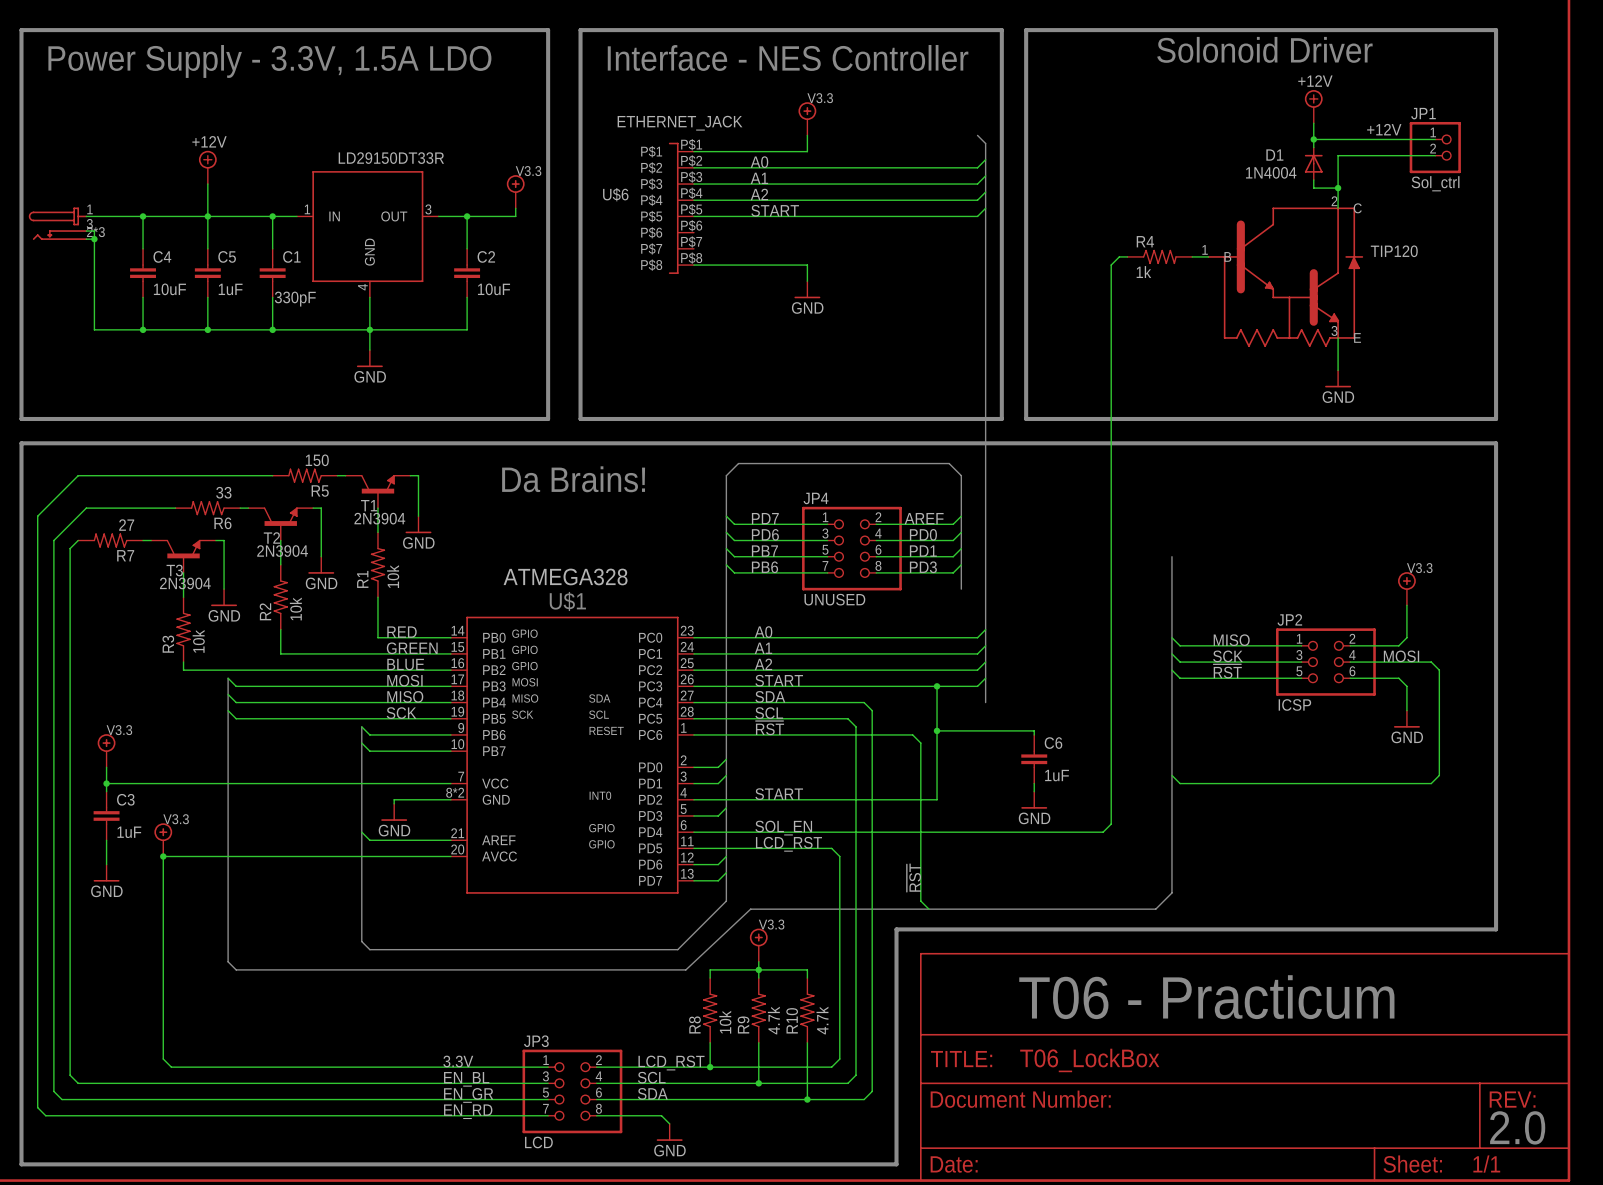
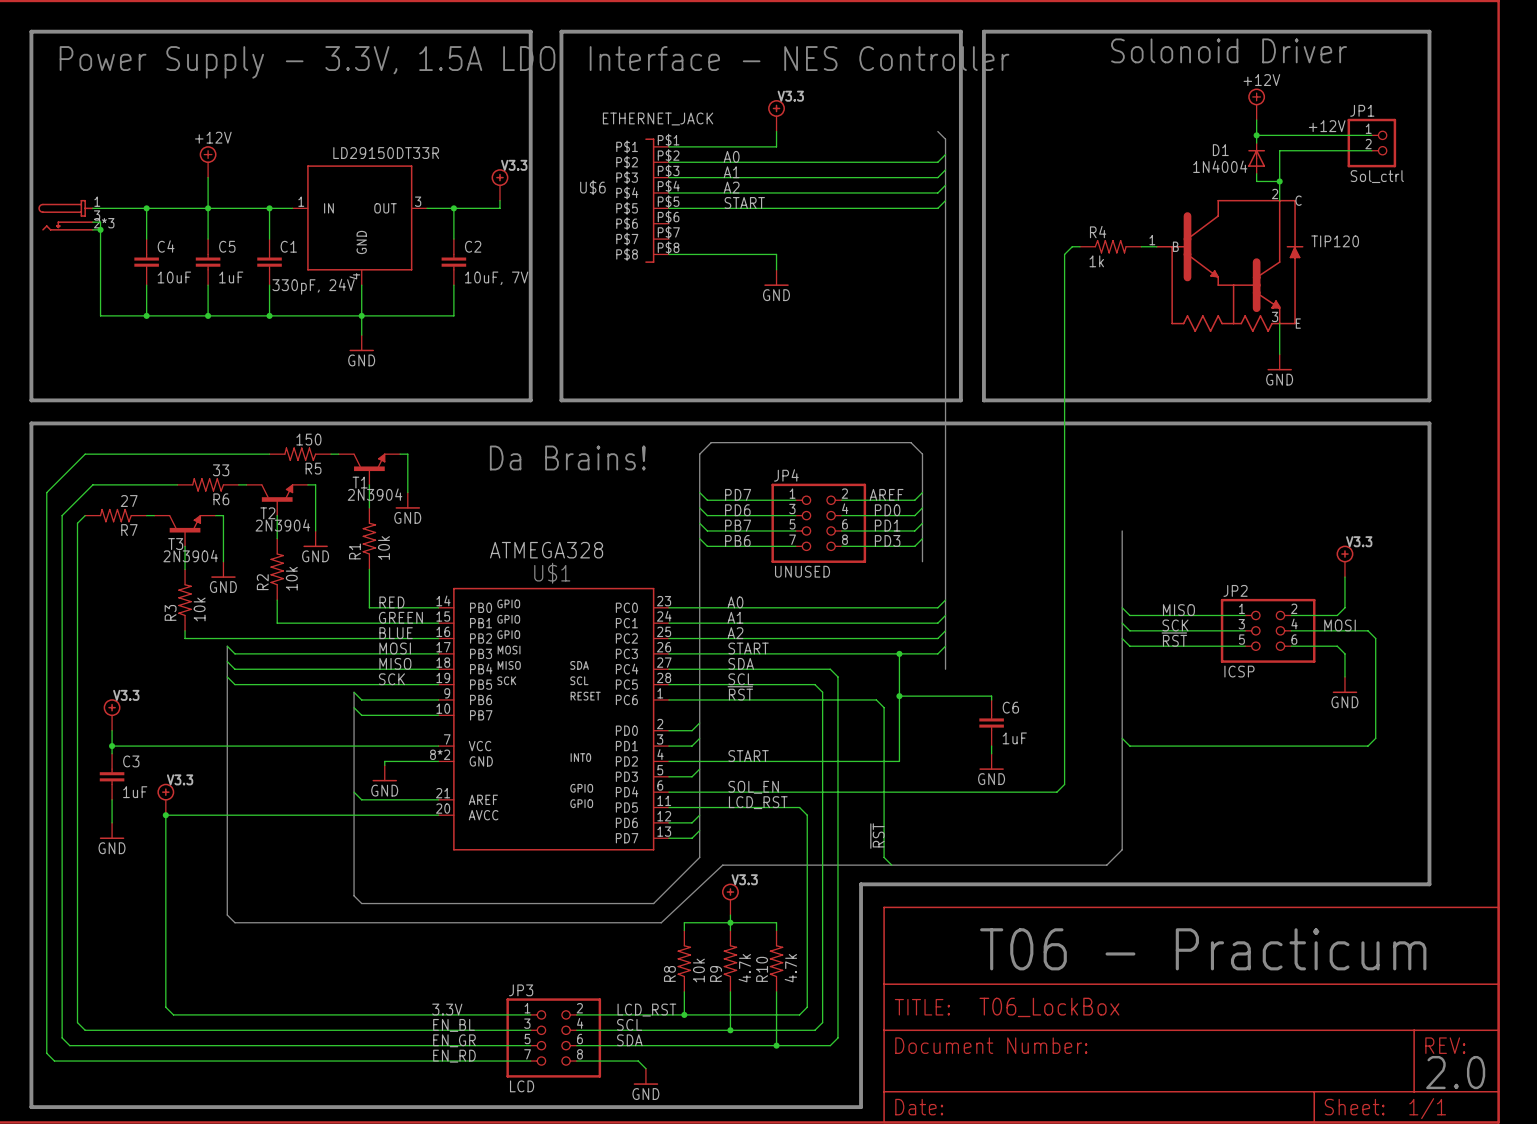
C2 value: 10uF (494, 289) -> 10uF, 7V (496, 278)
C1 value: 330pF (295, 299) -> 330pF, 24V (313, 286)

